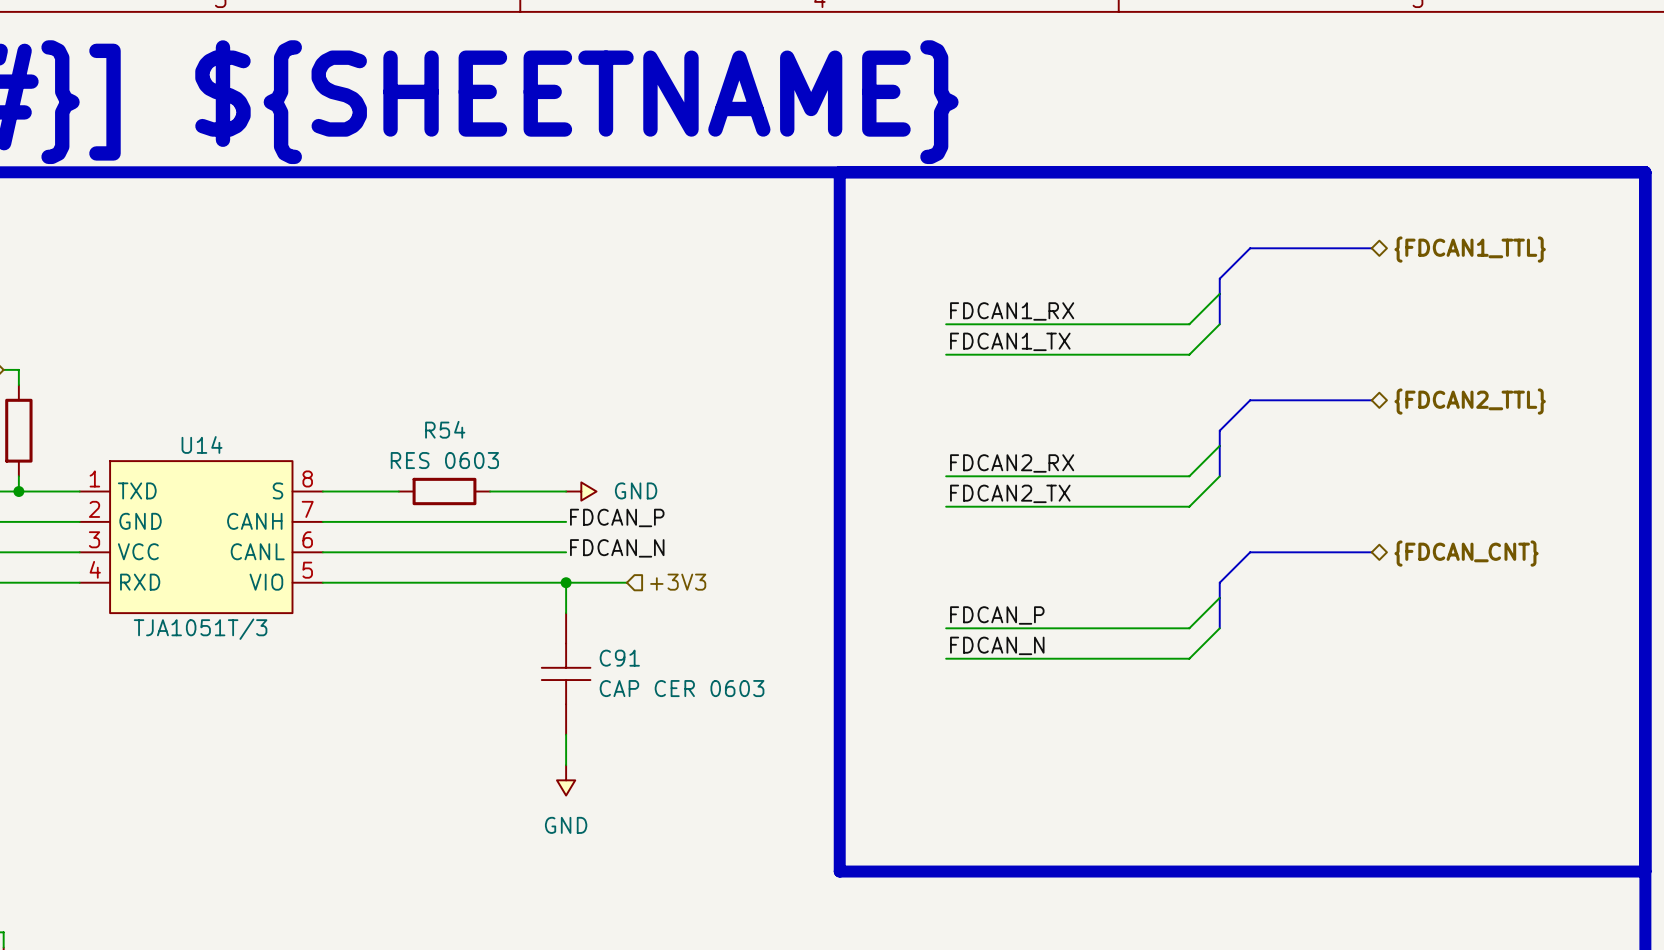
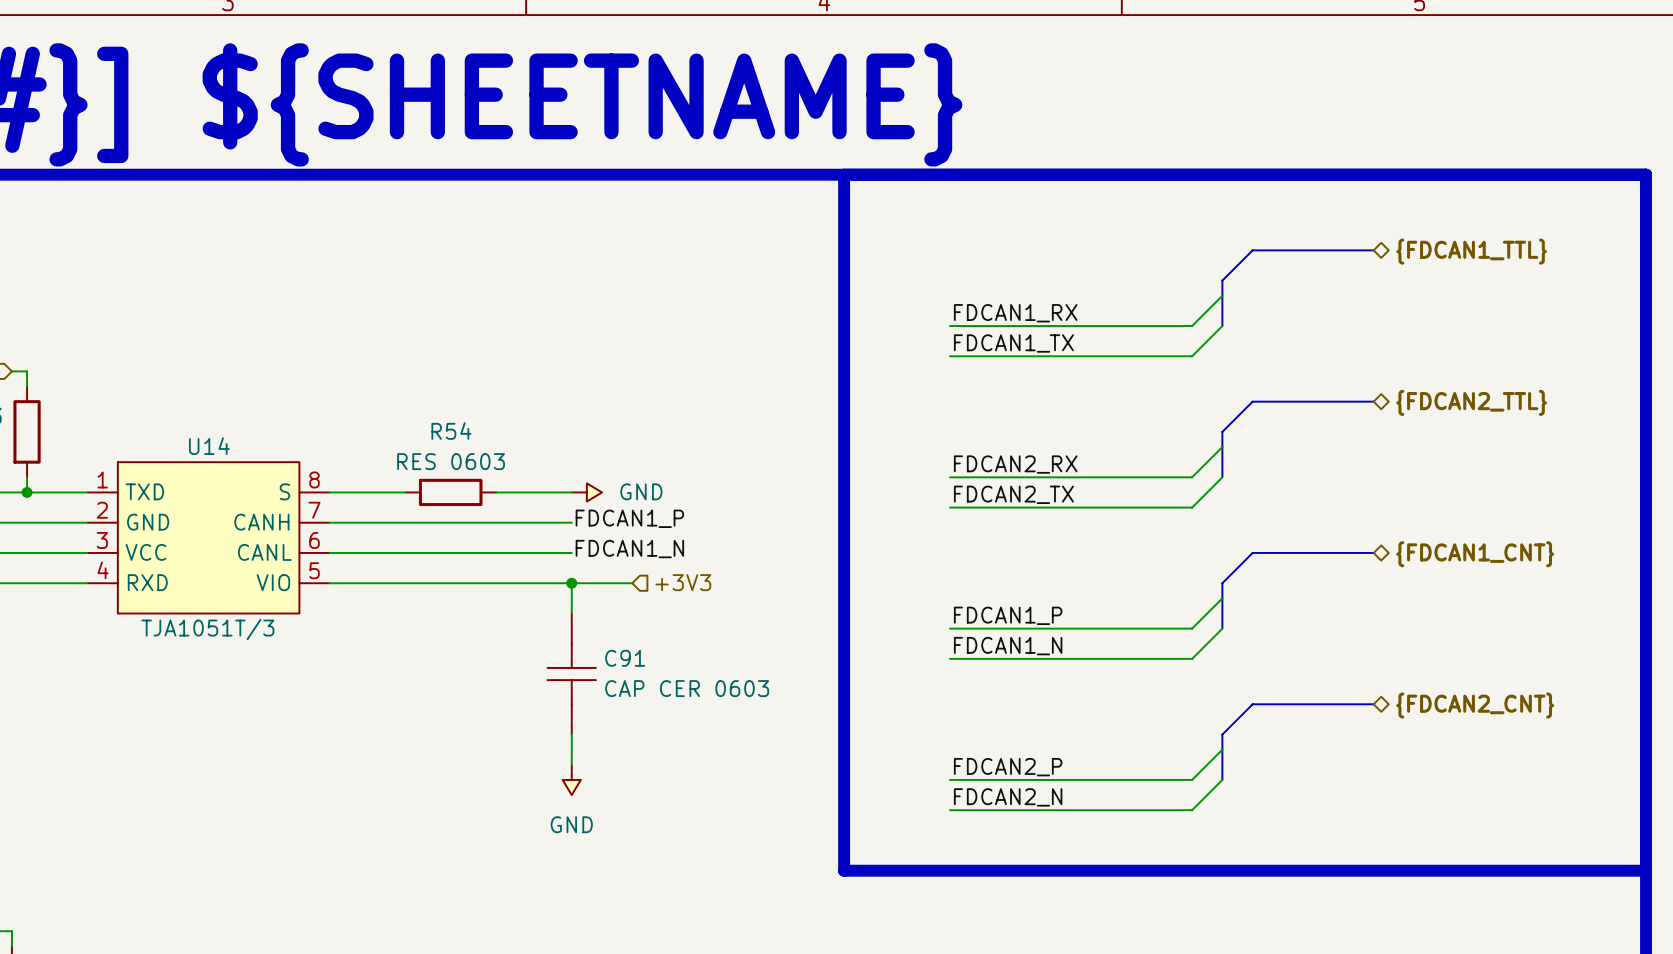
label: FDCAN_P (617, 517) -> FDCAN1_P (629, 518)
label: FDCAN_N (617, 548) -> FDCAN1_N (629, 549)
hierarchical label: {FDCAN_CNT} (1466, 553) -> {FDCAN1_CNT} (1475, 554)
label: FDCAN_P (997, 615) -> FDCAN1_P (1008, 615)
label: FDCAN_N (997, 645) -> FDCAN1_N (1008, 646)
bus: none -> (1373, 704) (1252, 704) (1222, 734) (1222, 779)
hierarchical label: none -> {FDCAN2_CNT} (1475, 705)
wire: none -> (1222, 749) (1192, 779) (950, 779)
label: none -> FDCAN2_P (1008, 767)
wire: none -> (1222, 779) (1192, 810) (950, 810)
label: none -> FDCAN2_N (1008, 797)

